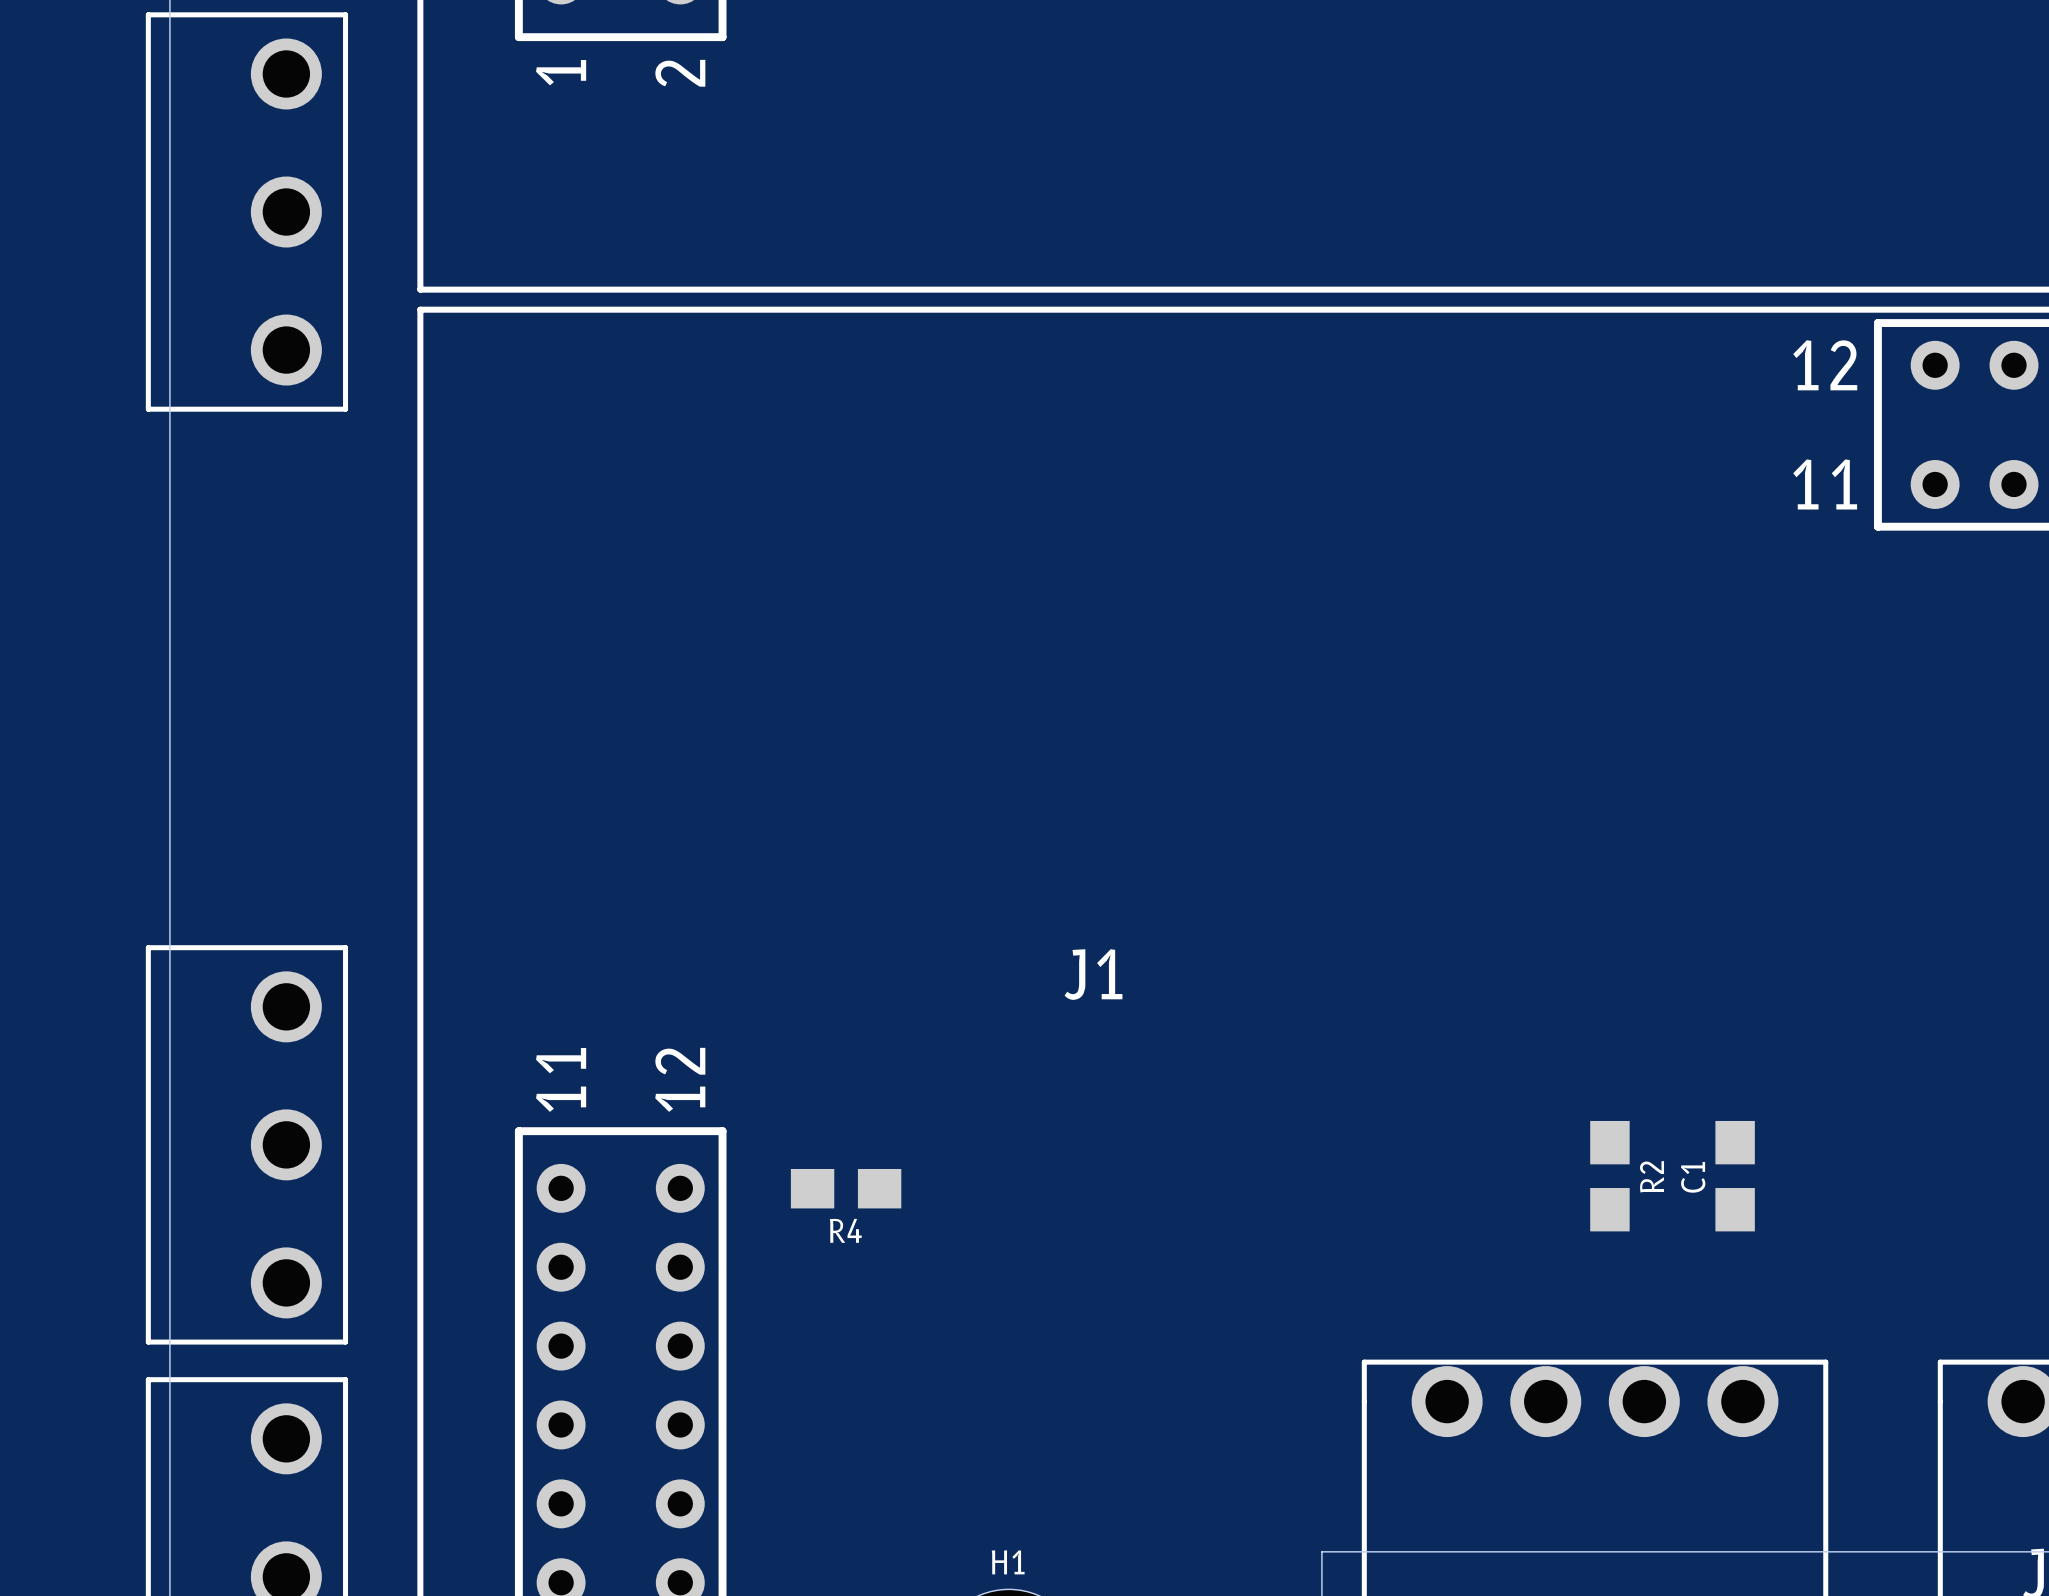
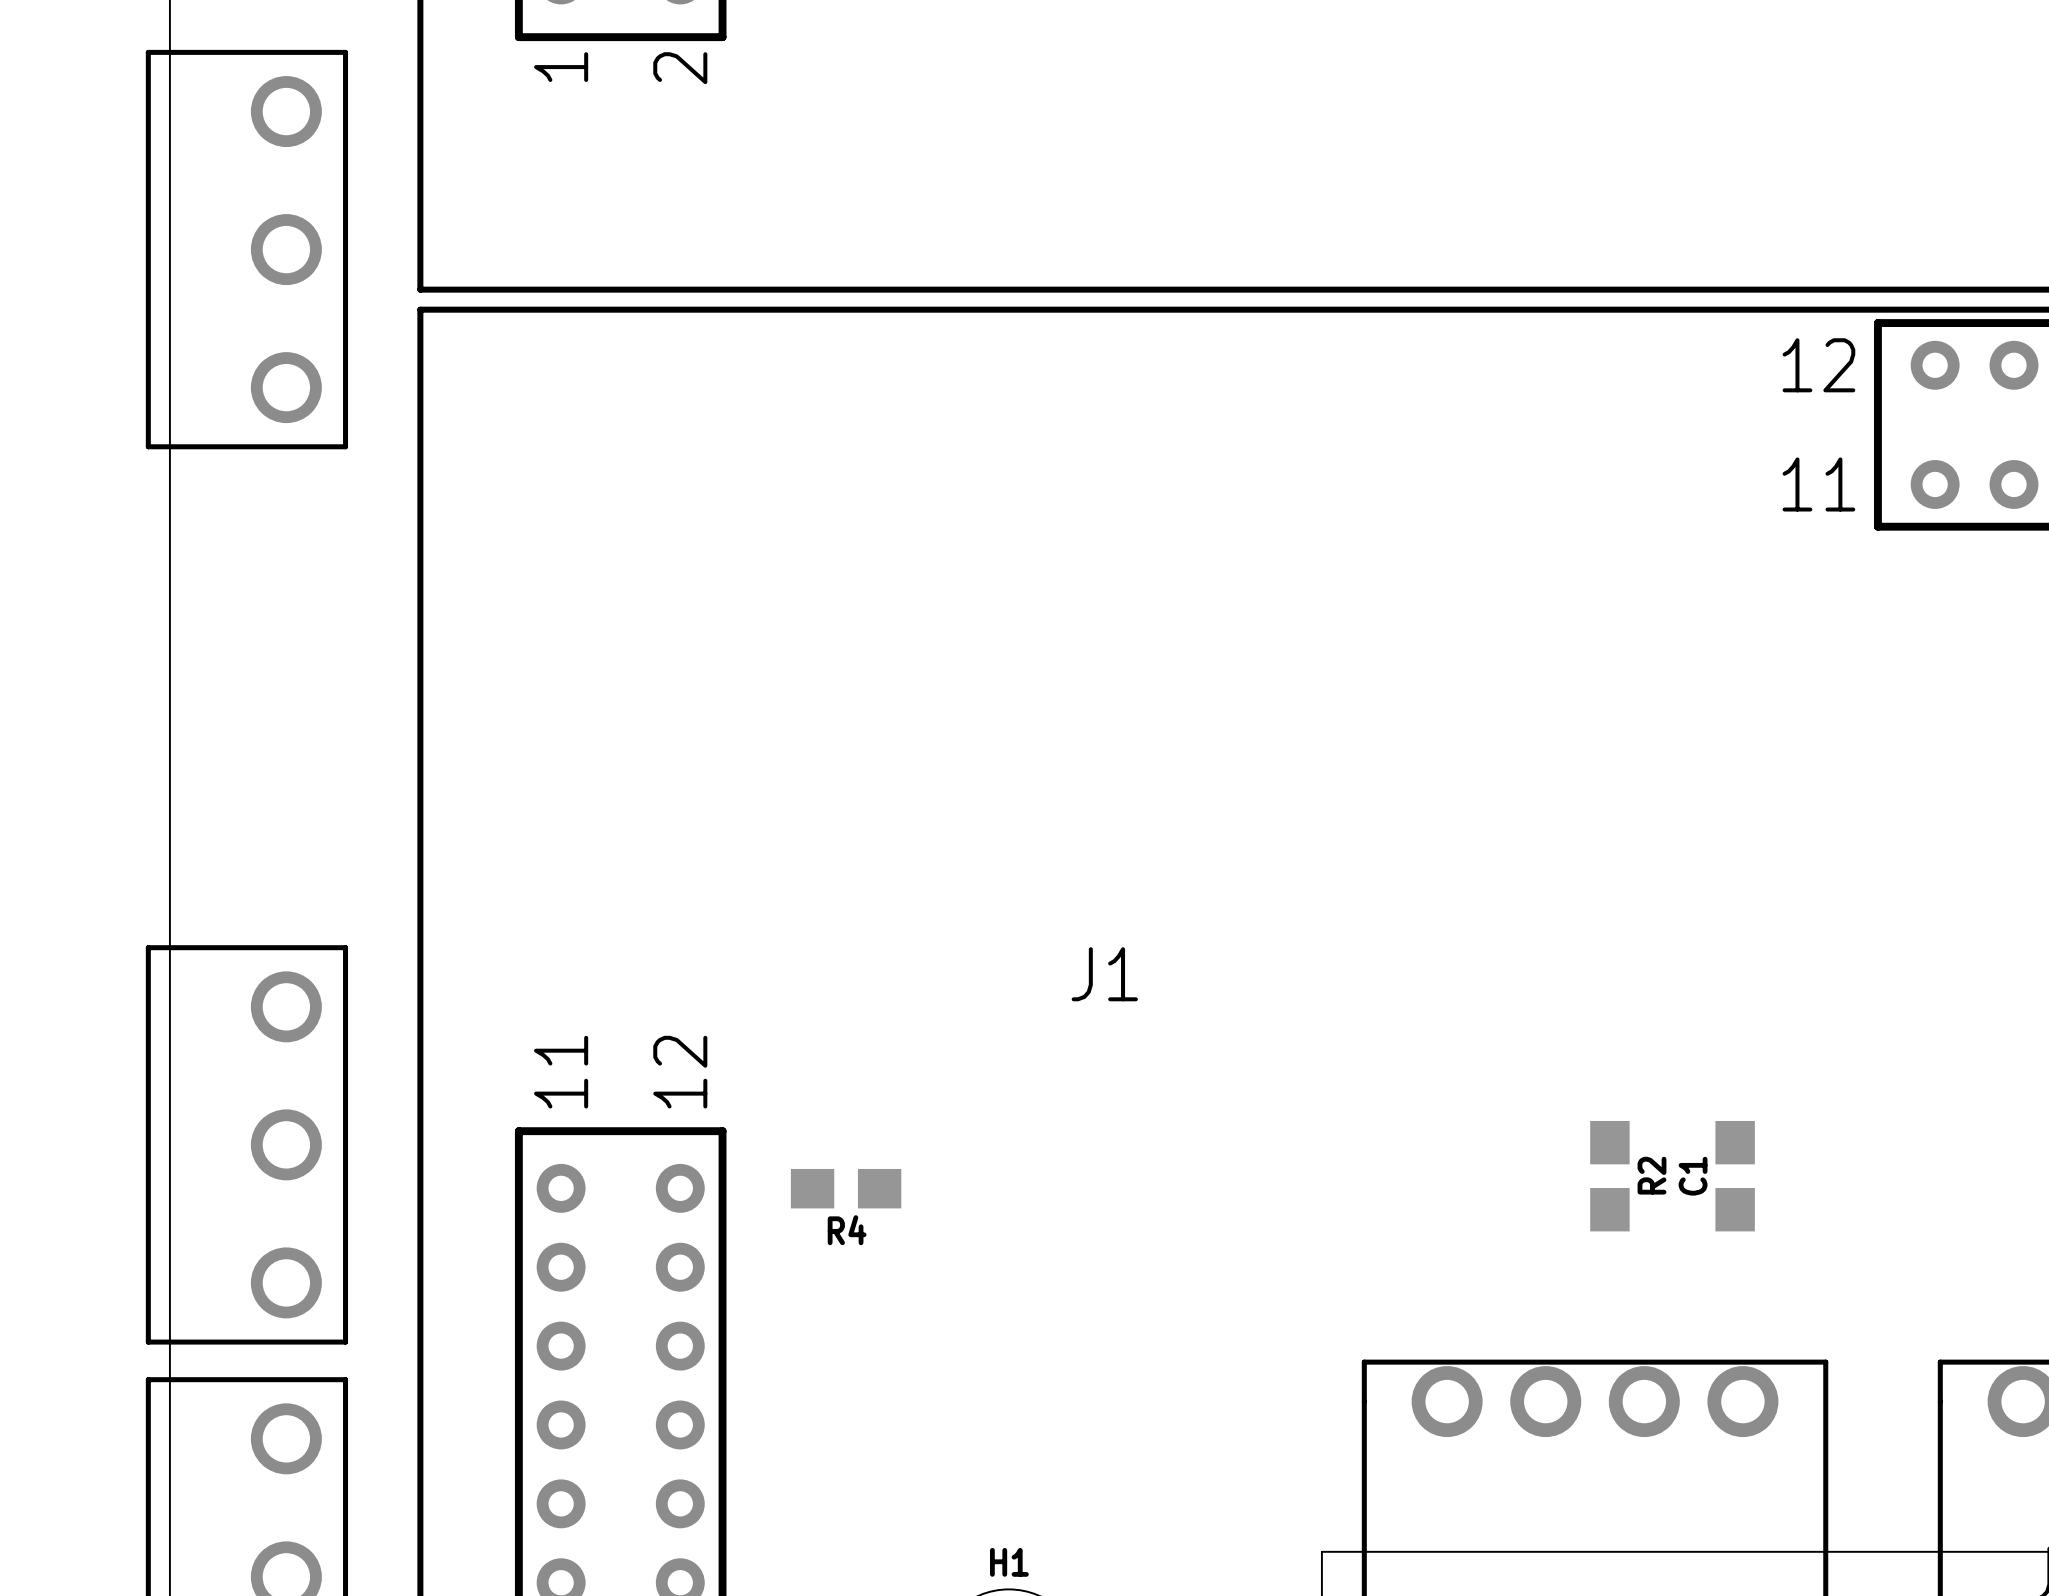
part position: (246, 212) -> (246, 249)

